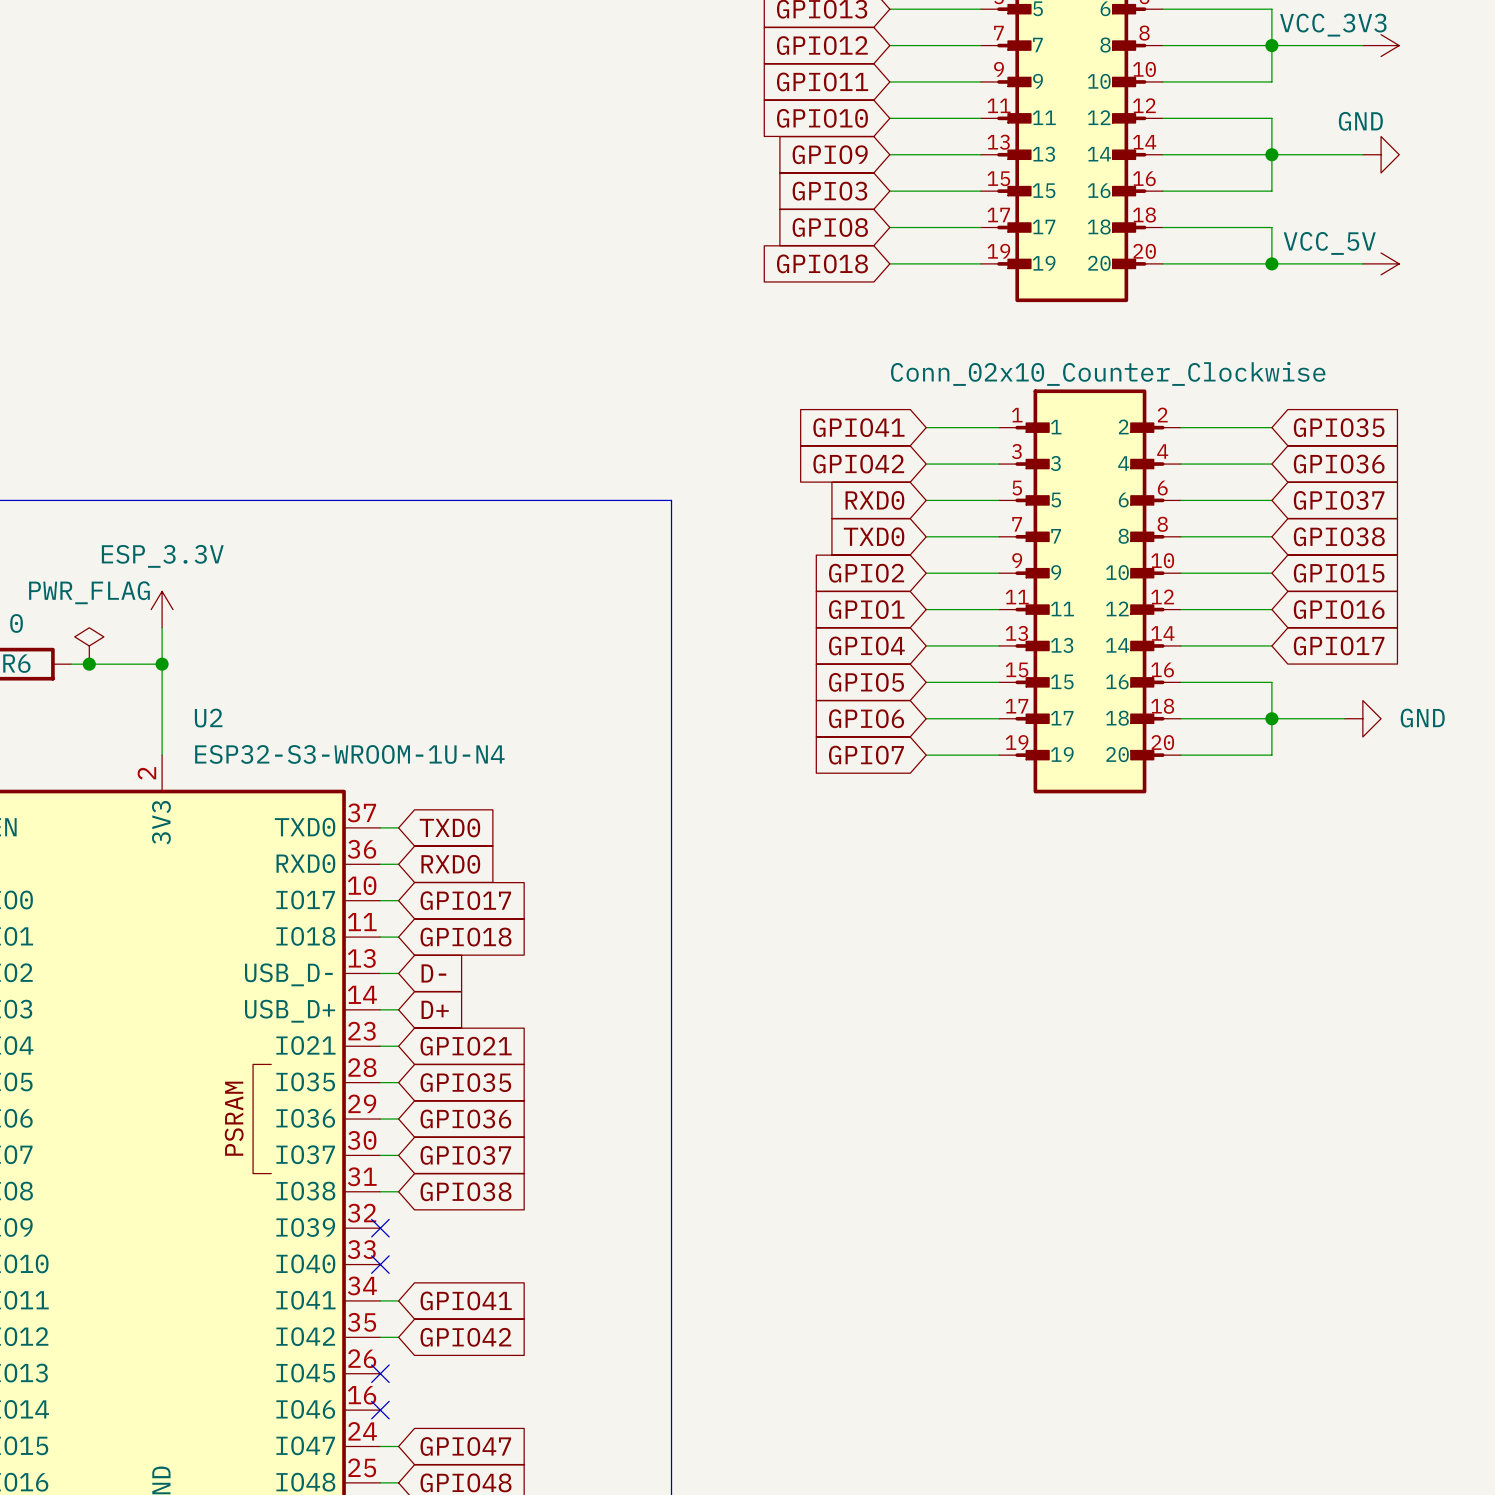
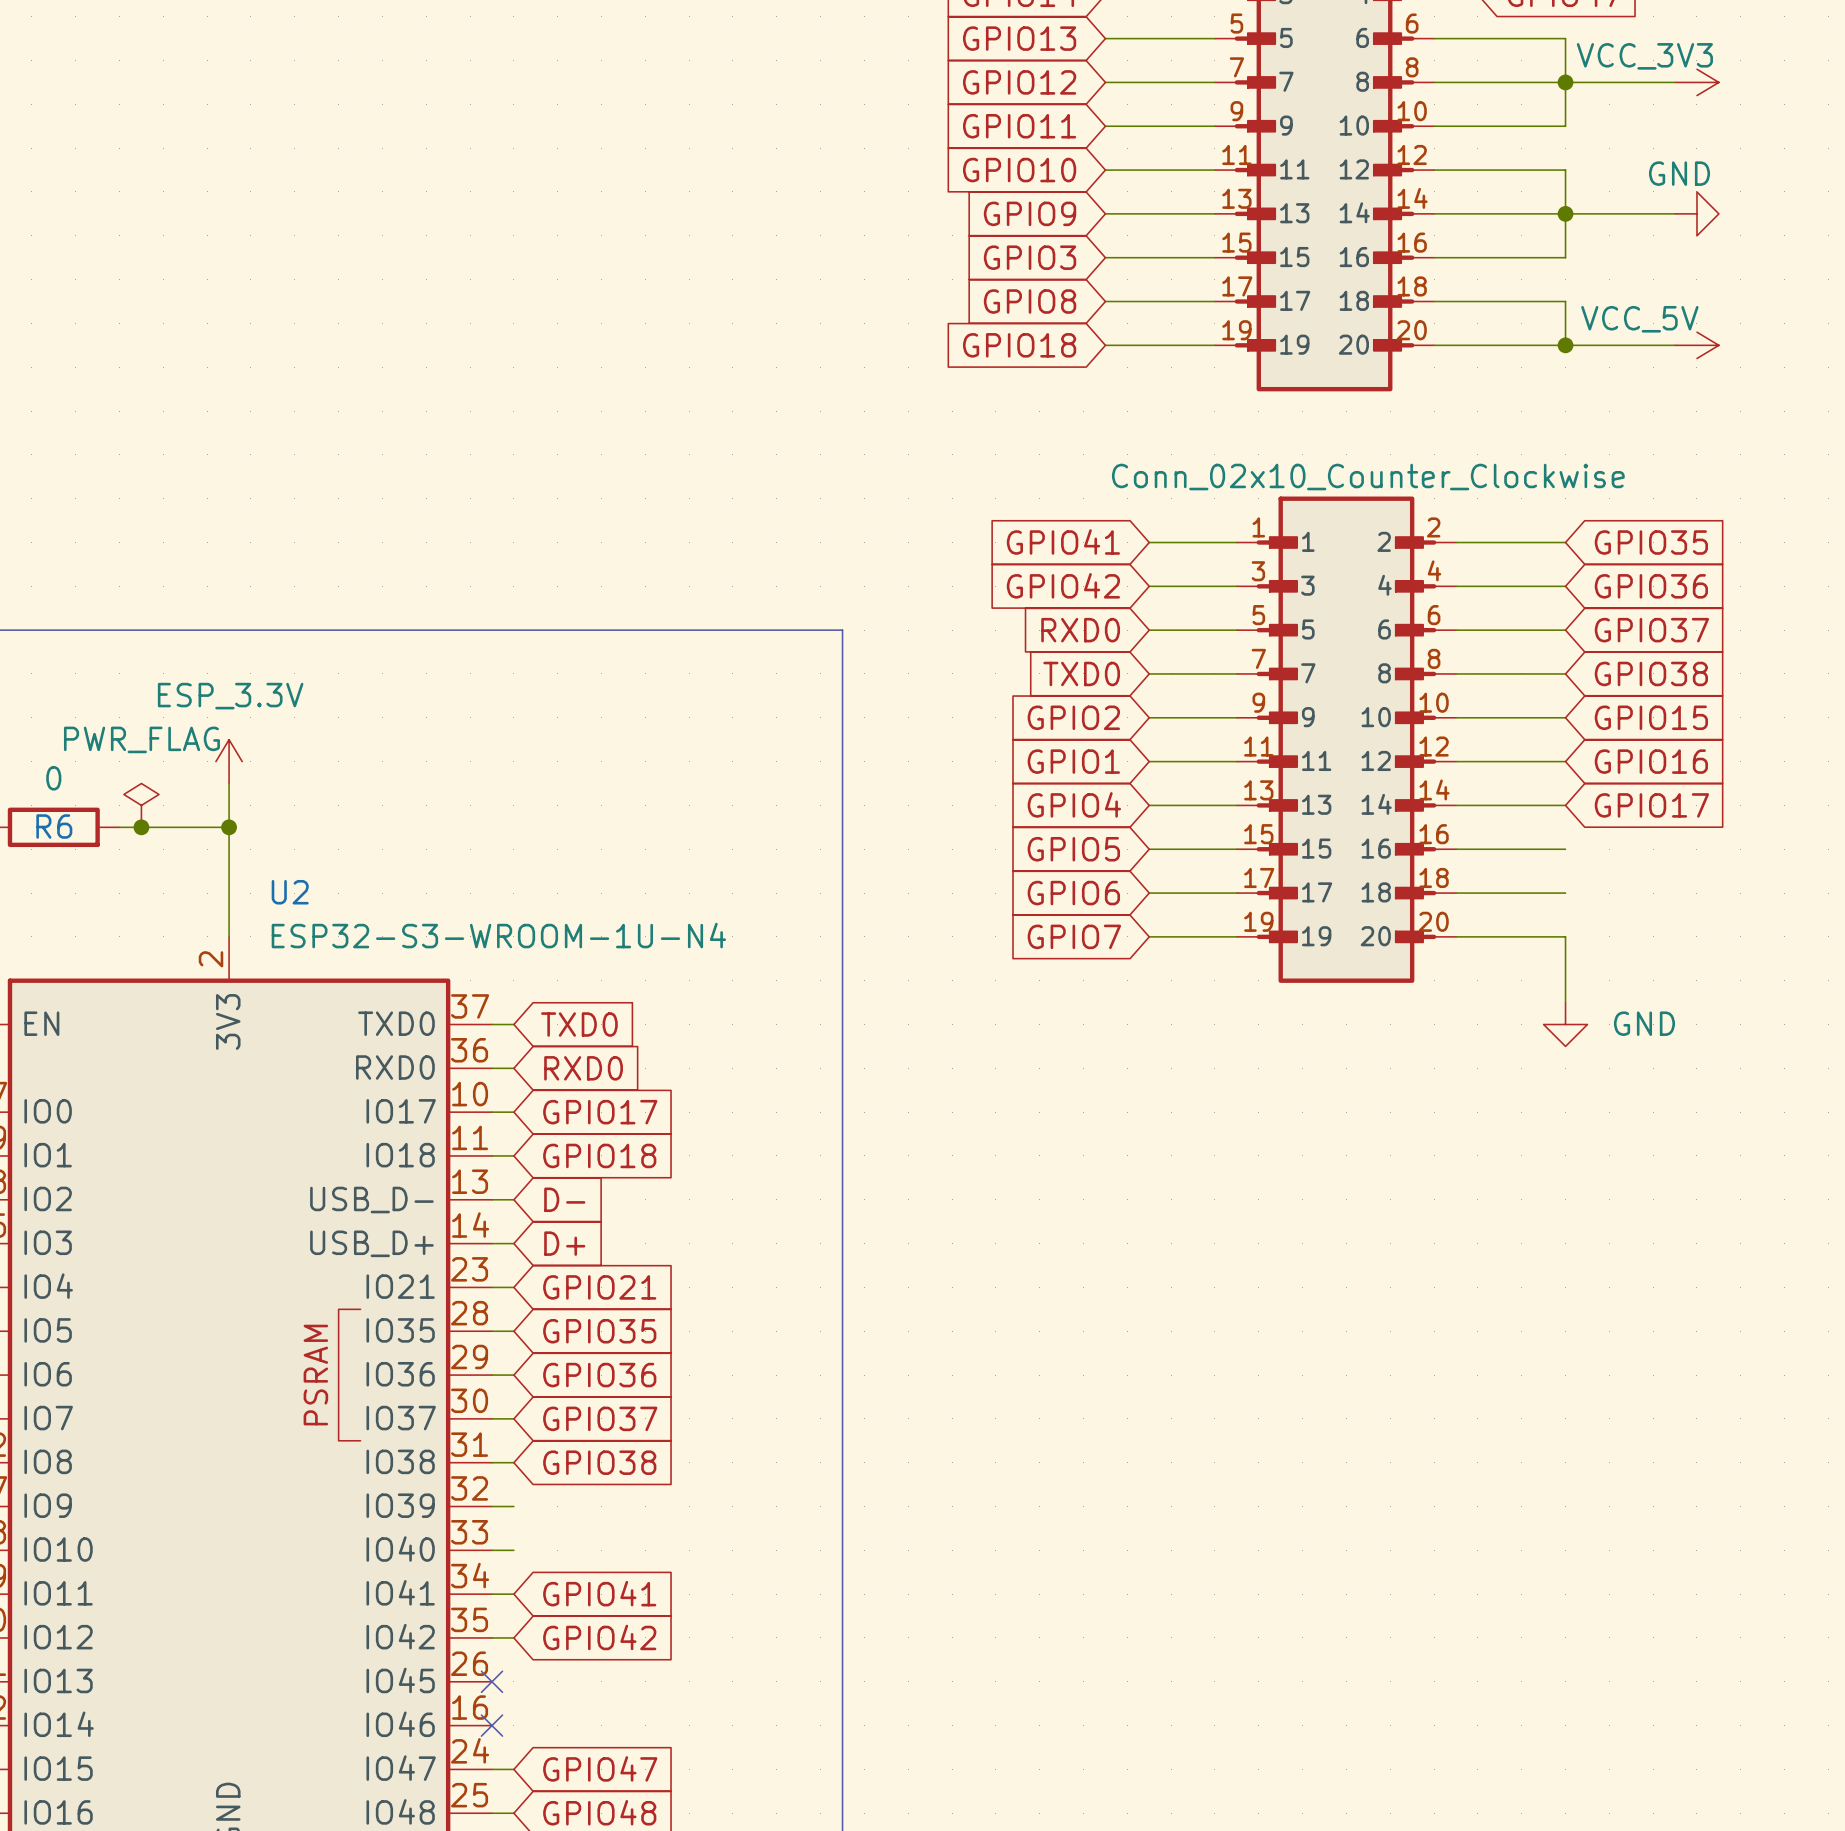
wire: (1271, 682) (1271, 755) -> (1565, 1002) (1565, 936)
wire: (1271, 718) (1344, 718) -> none
junction: (1271, 718) -> none
power symbol rotation: 0° (1362, 718) -> 90° clockwise (1565, 1024)
power symbol position: GND (1362, 718) -> GND (1565, 1024)
wire: none -> (491, 1506) (513, 1506)
no-connect mark: (380, 1228) -> none
wire: none -> (491, 1550) (513, 1550)
no-connect mark: (380, 1264) -> none

